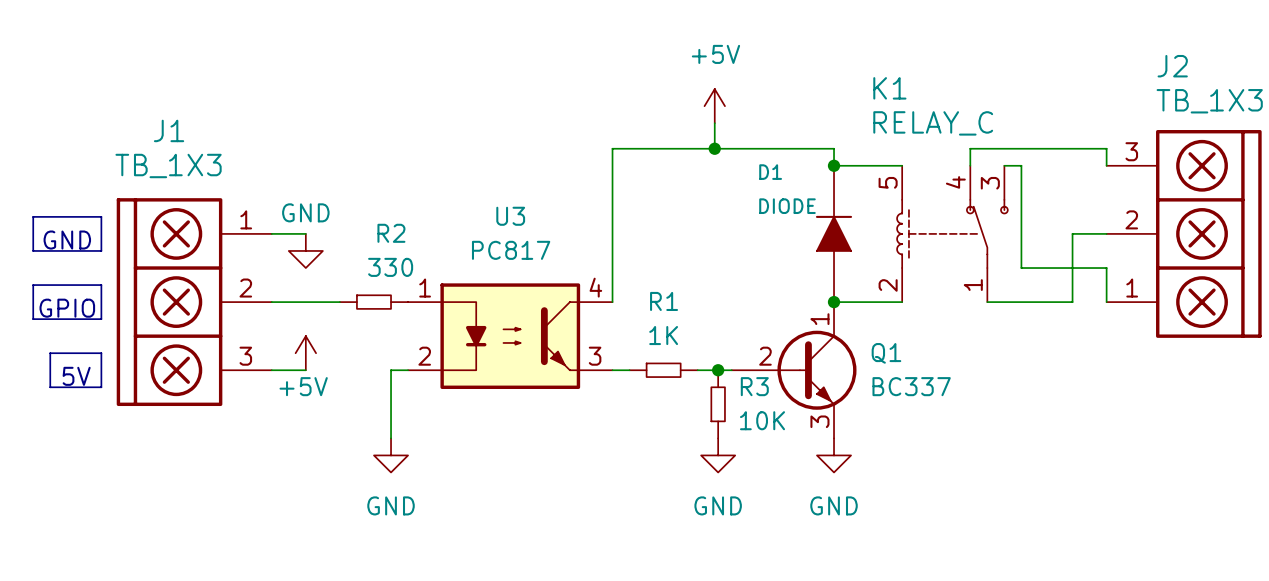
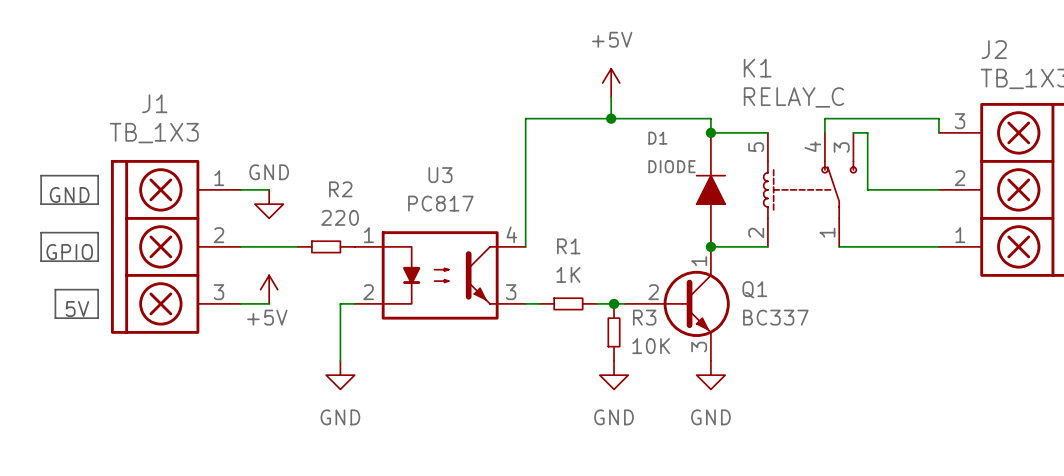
wire: (1021, 233) (1021, 268) (1106, 268) (1106, 302) -> (867, 189) (910, 189)
wire: (1072, 233) (1072, 302) -> (938, 246) (910, 246)
R2 value: 330 (390, 267) -> 220 (340, 217)

